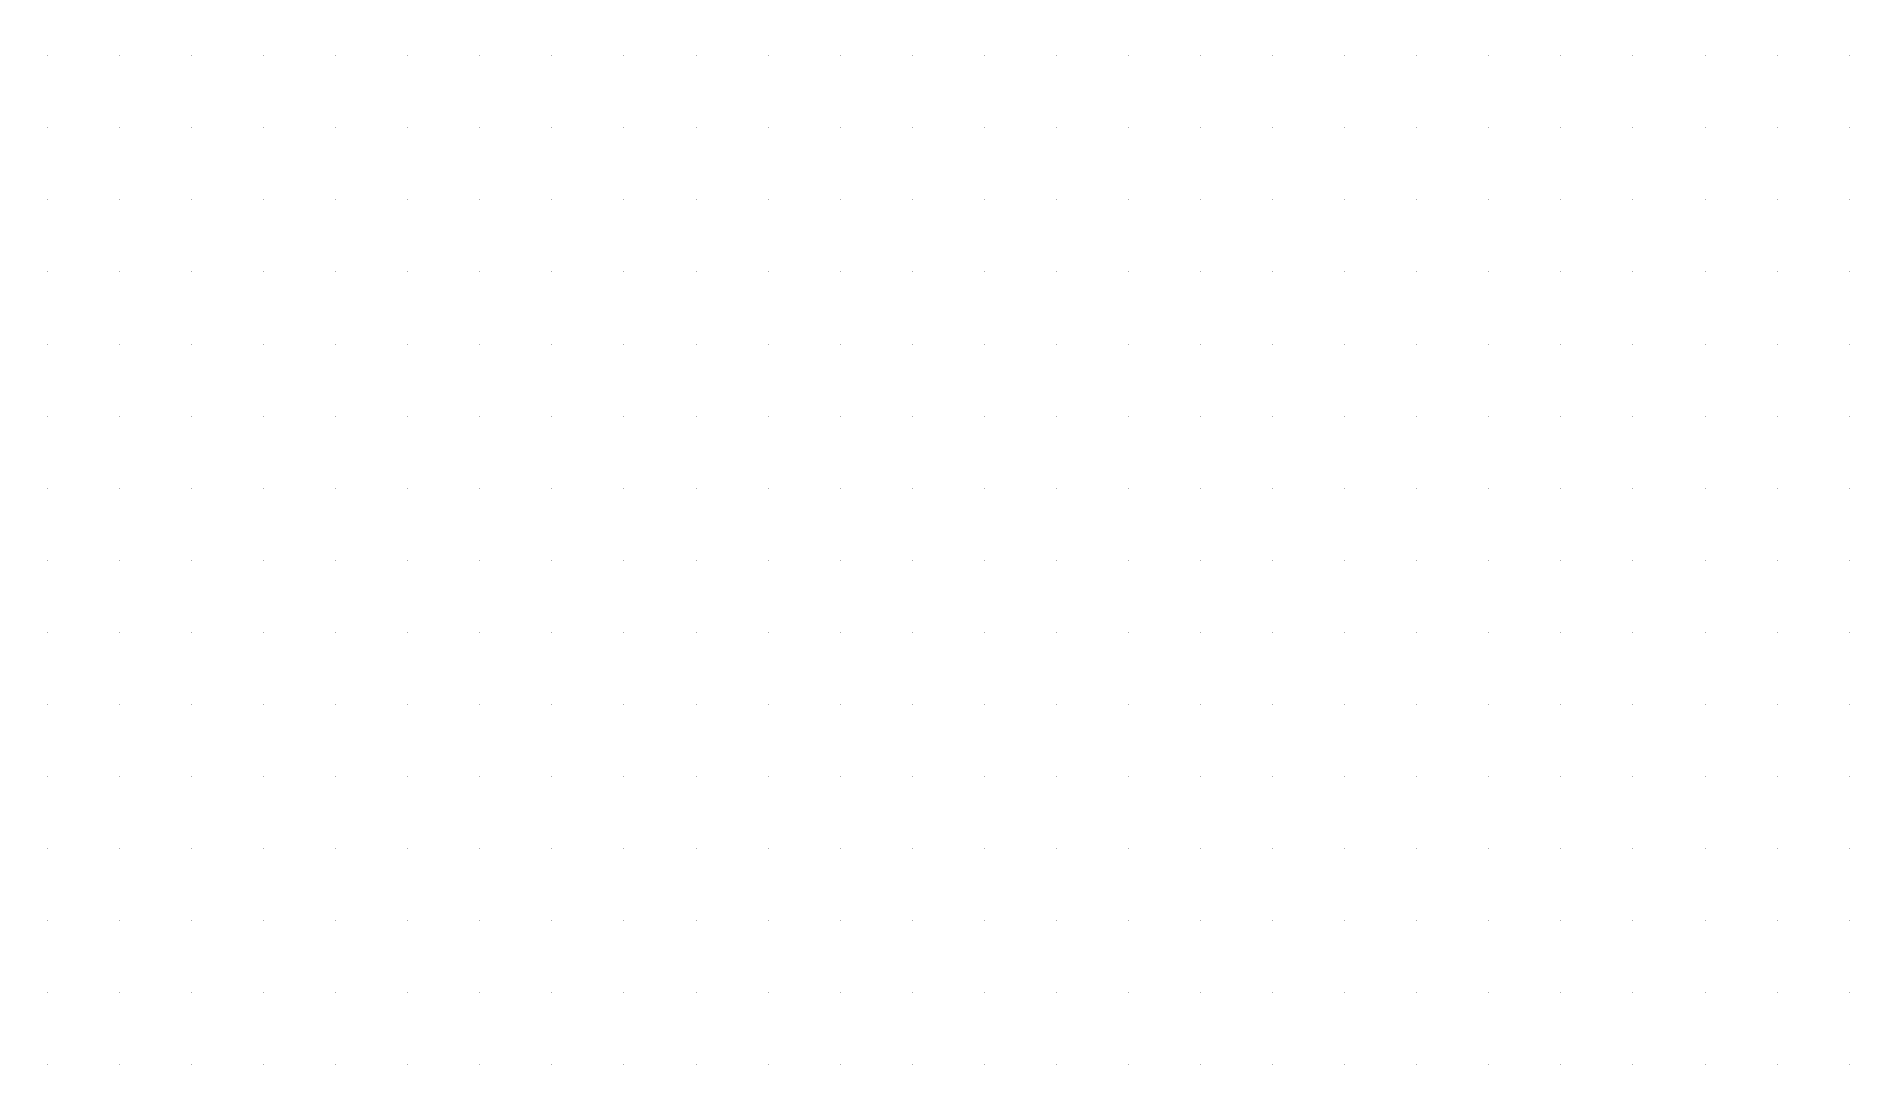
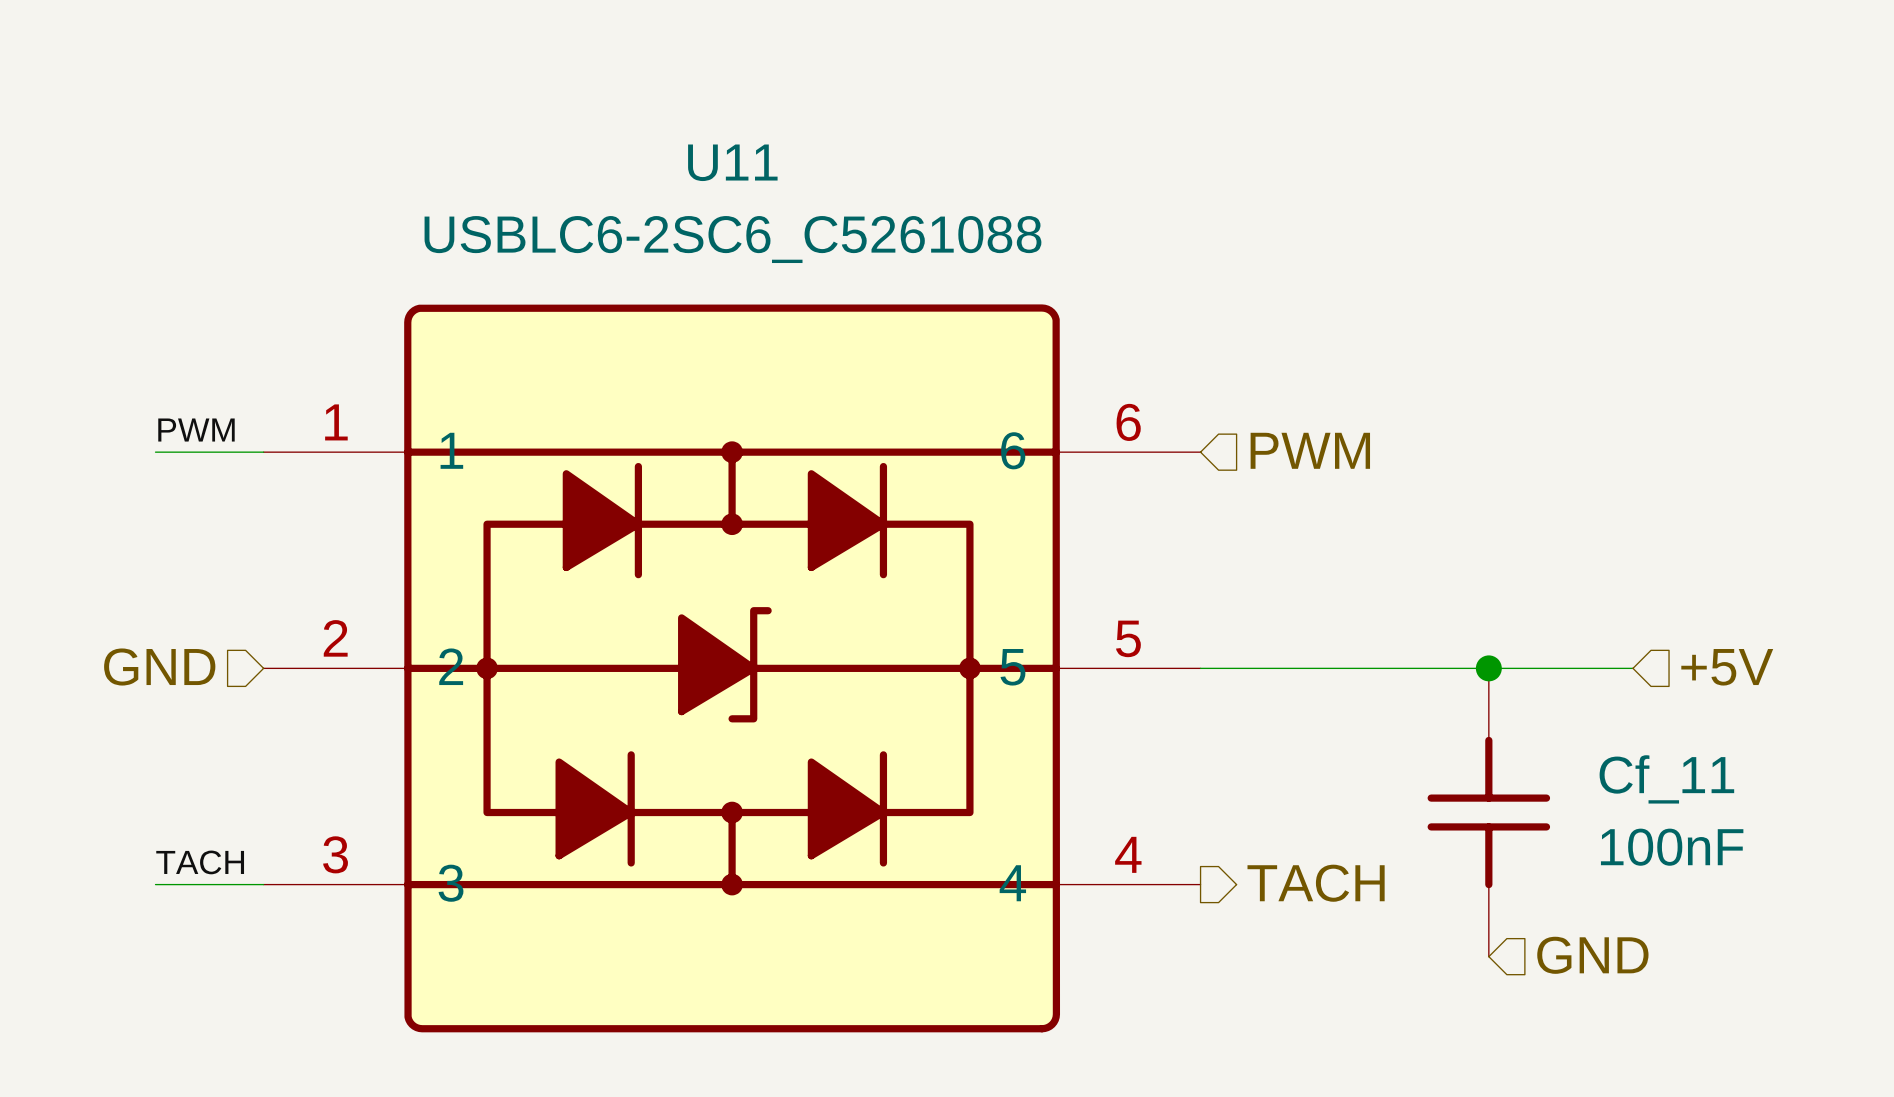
label: none -> PWM (196, 430)
hierarchical label: none -> PWM (1310, 450)
wire: none -> (155, 452) (263, 452)
hierarchical label: none -> GND (159, 667)
hierarchical label: none -> +5V (1727, 667)
U11: none -> USBLC6-2SC6_C5261088 (732, 668)
wire: none -> (1200, 668) (1632, 668)
junction: none -> (1488, 668)
Cf_11: none -> 100nF (1488, 812)
label: none -> TACH (200, 862)
hierarchical label: none -> TACH (1316, 883)
wire: none -> (155, 884) (263, 884)
hierarchical label: none -> GND (1592, 955)

